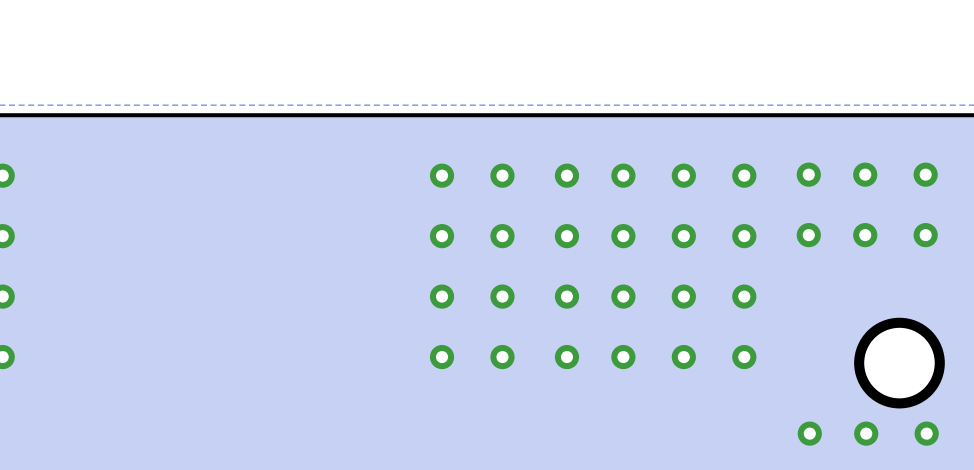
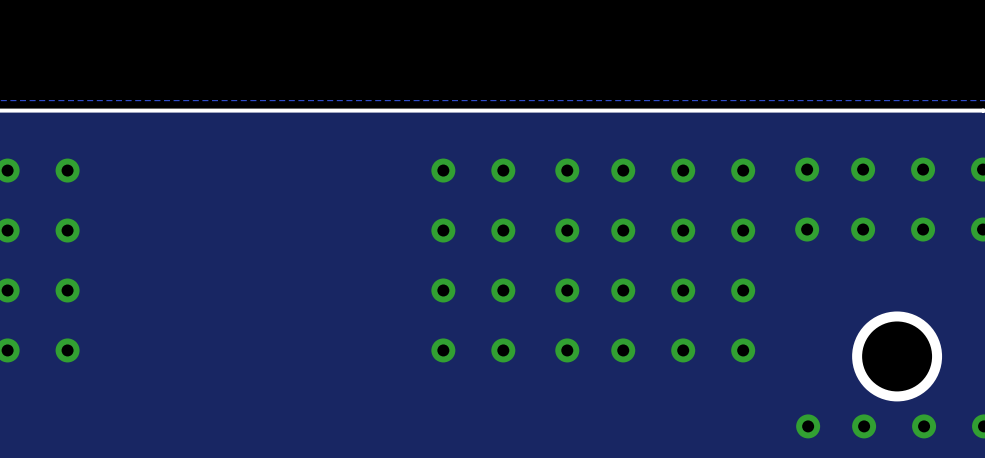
via: none -> (67, 170)
via: none -> (67, 230)
via: none -> (67, 290)
via: none -> (67, 350)

